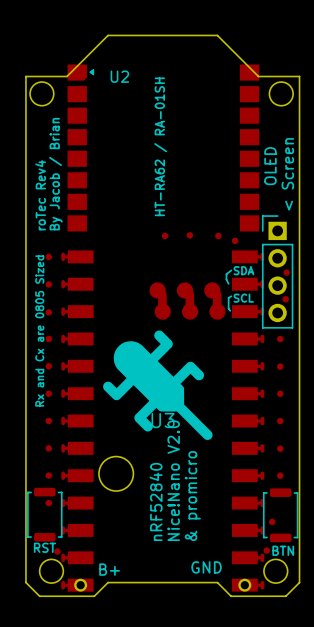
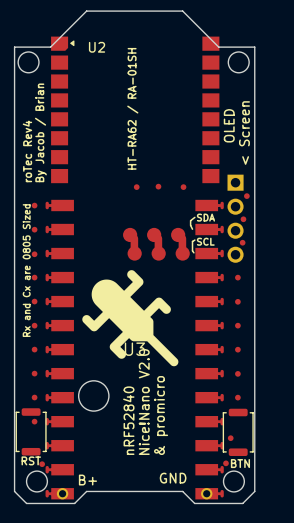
part footprint: [262, 215, 294, 329] -> [227, 174, 244, 263]
part position: (235, 240) -> (246, 196)

